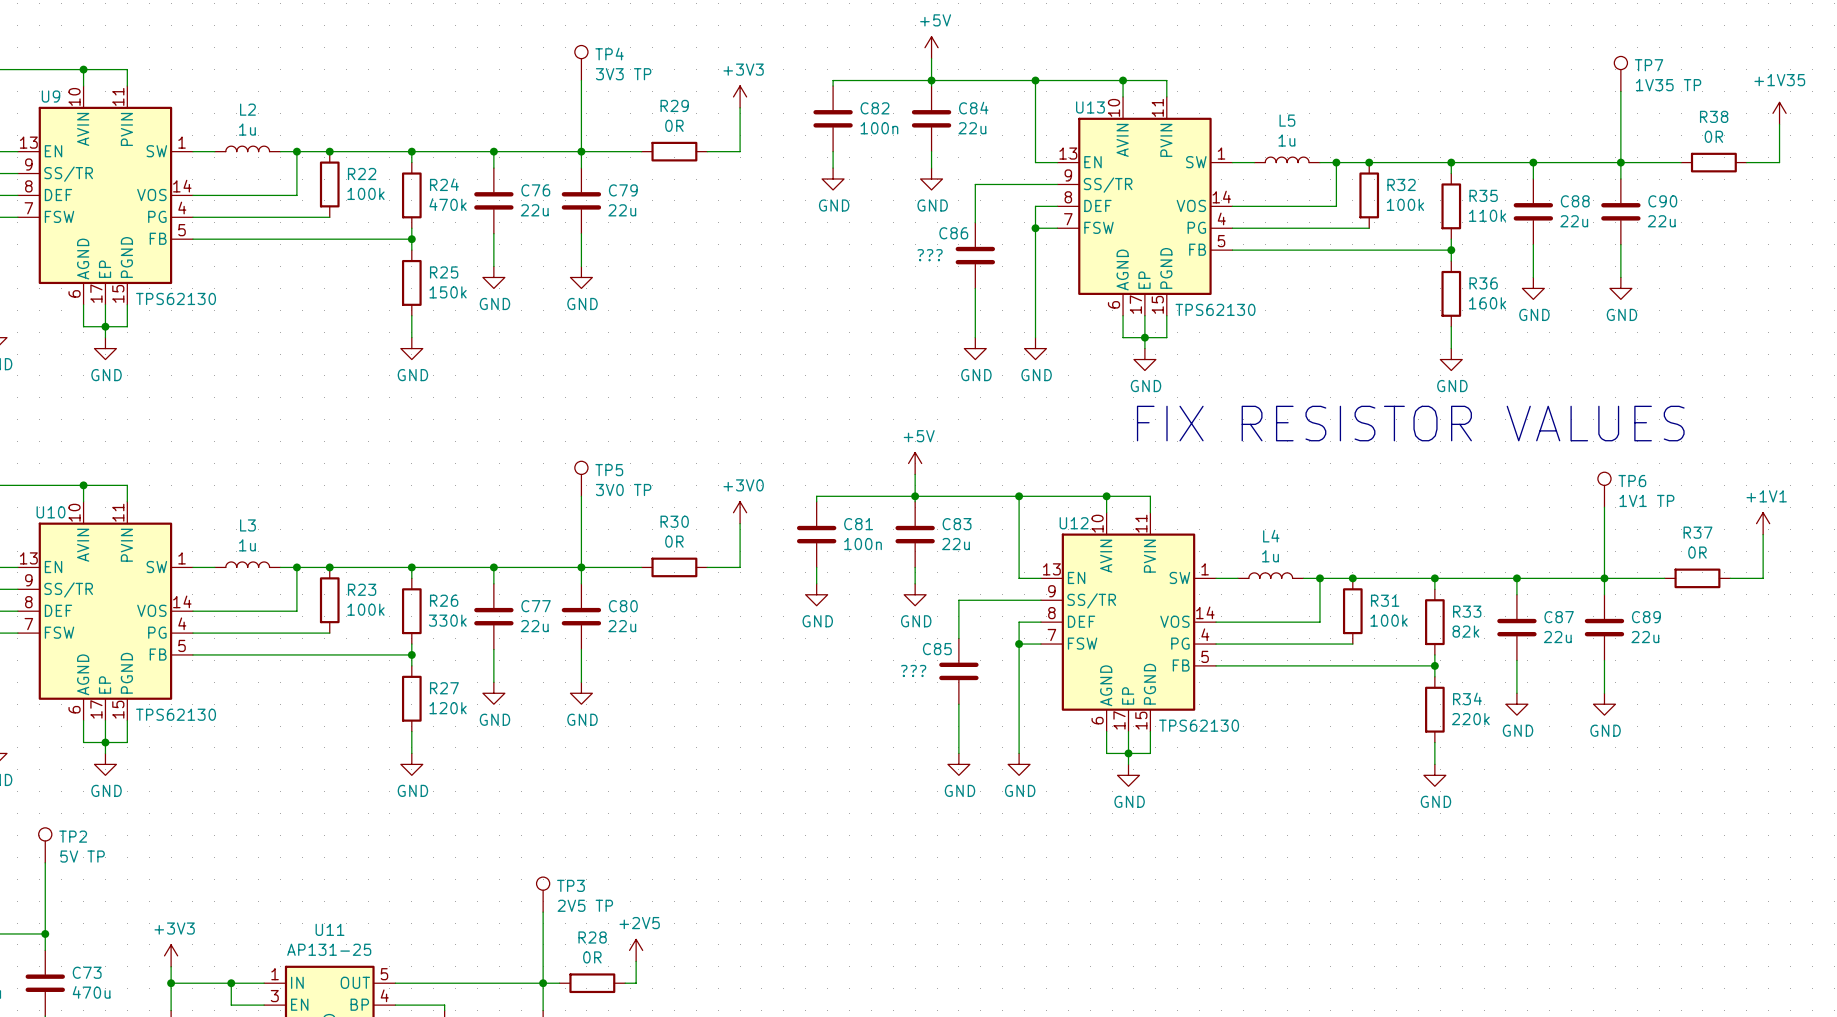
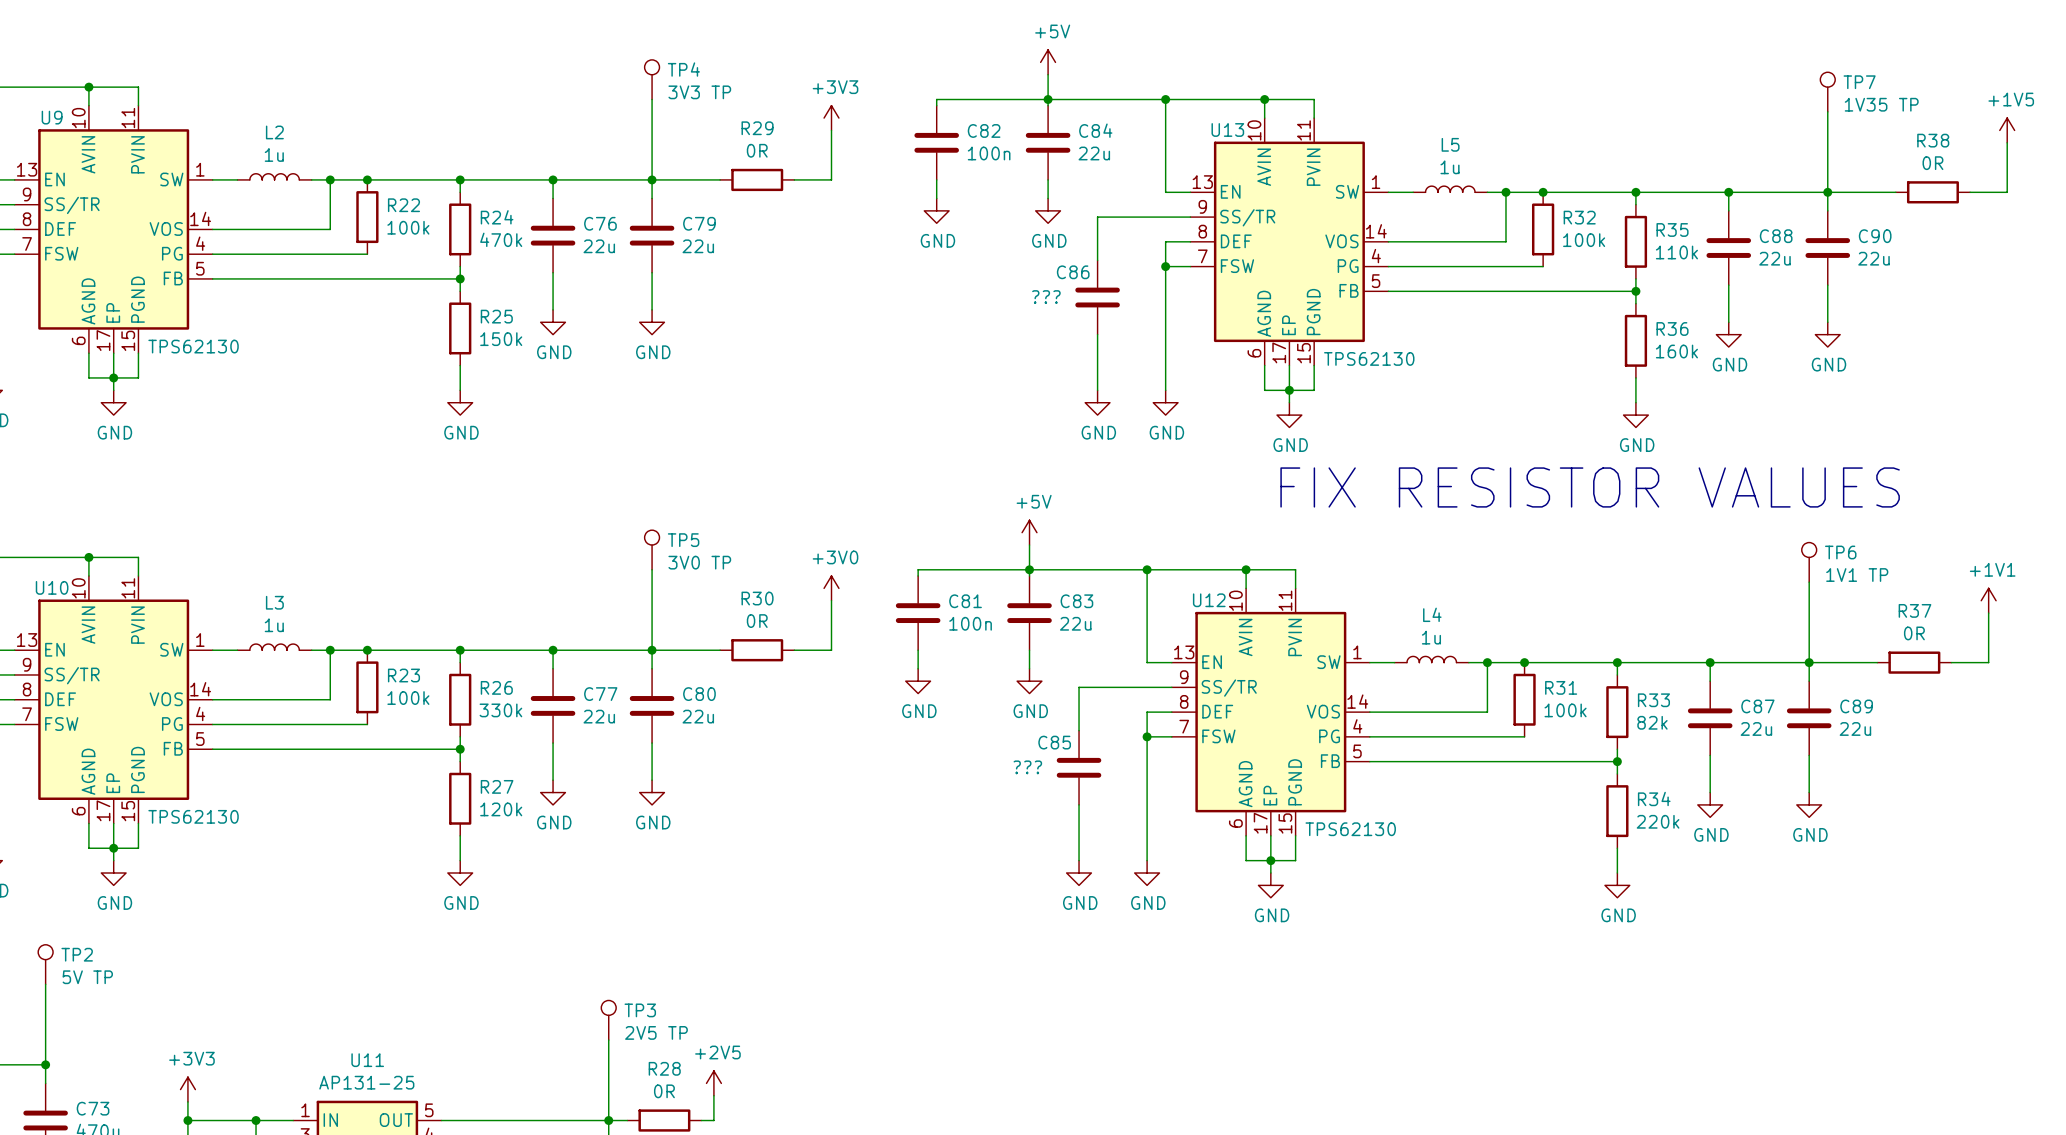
power symbol: +1V35 (1779, 113) -> +1V5 (2007, 130)

